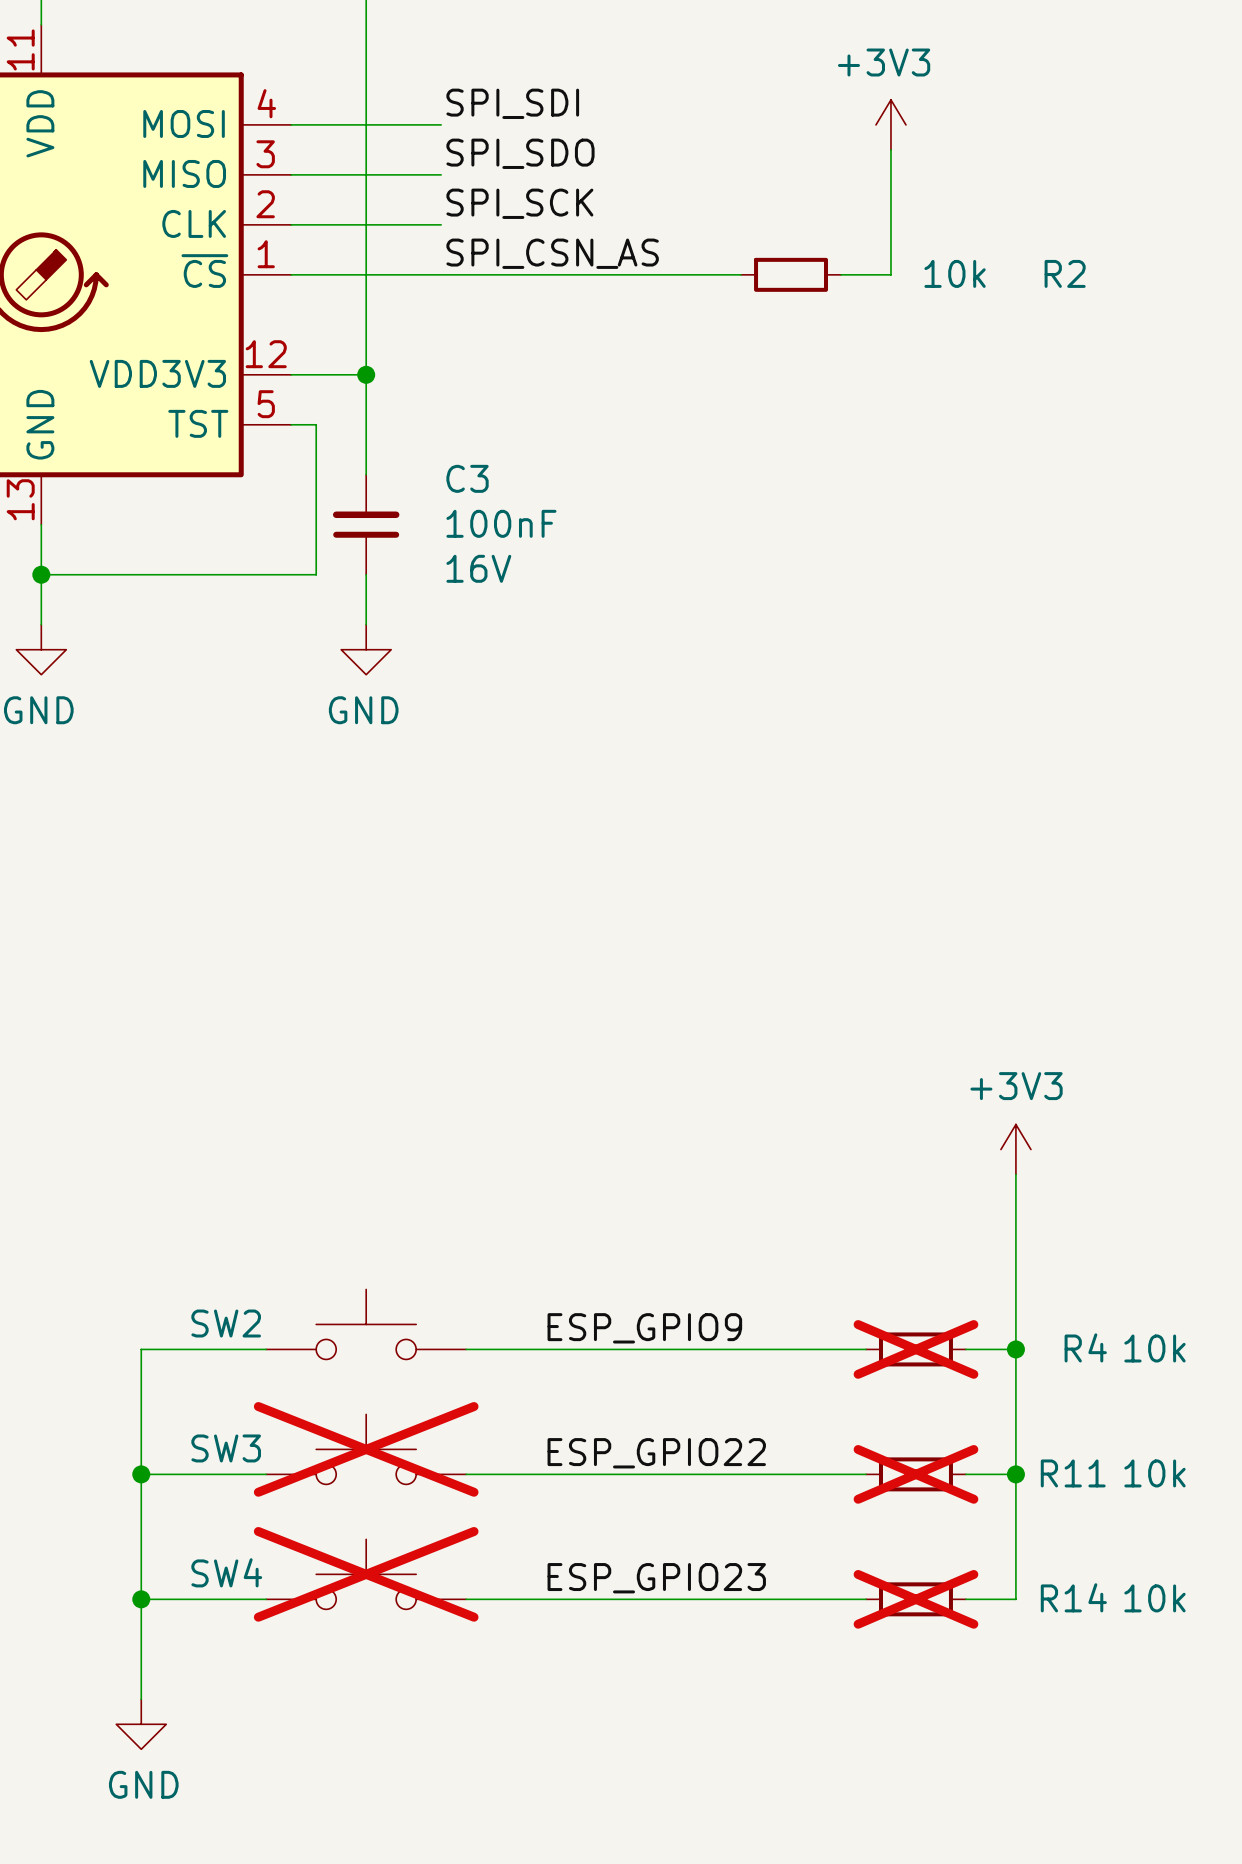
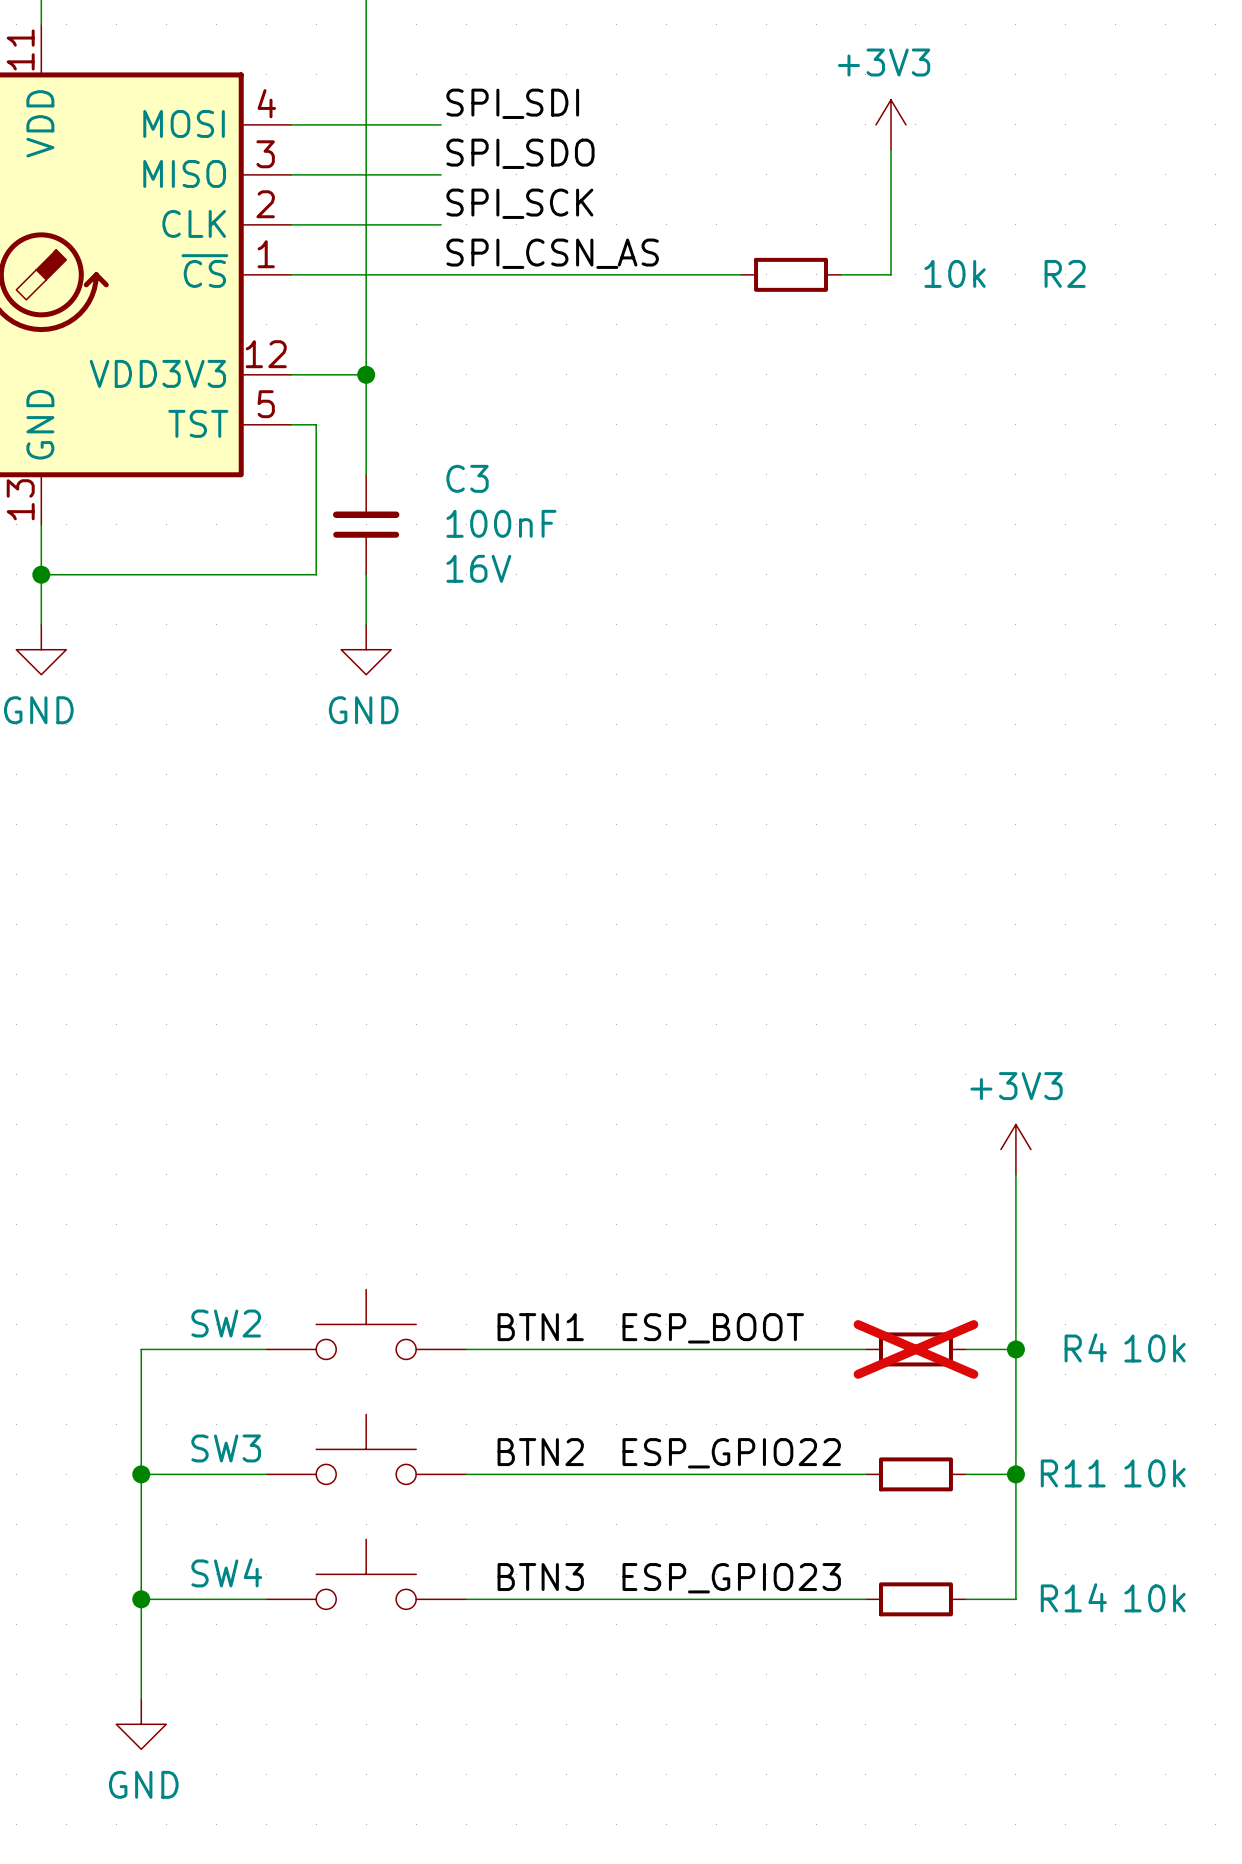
label: none -> BTN1 (540, 1327)
label: ESP_GPIO9 (644, 1328) -> none
label: none -> ESP_BOOT (713, 1328)
SW3 do-not-place cross: (366, 1449) -> none
label: none -> BTN2 (540, 1452)
label position: ESP_GPIO22 (656, 1453) -> ESP_GPIO22 (731, 1453)
R11 do-not-place cross: (915, 1474) -> none
SW4 do-not-place cross: (366, 1574) -> none
label: none -> BTN3 (540, 1577)
label position: ESP_GPIO23 (656, 1578) -> ESP_GPIO23 (731, 1578)
R14 do-not-place cross: (915, 1599) -> none

